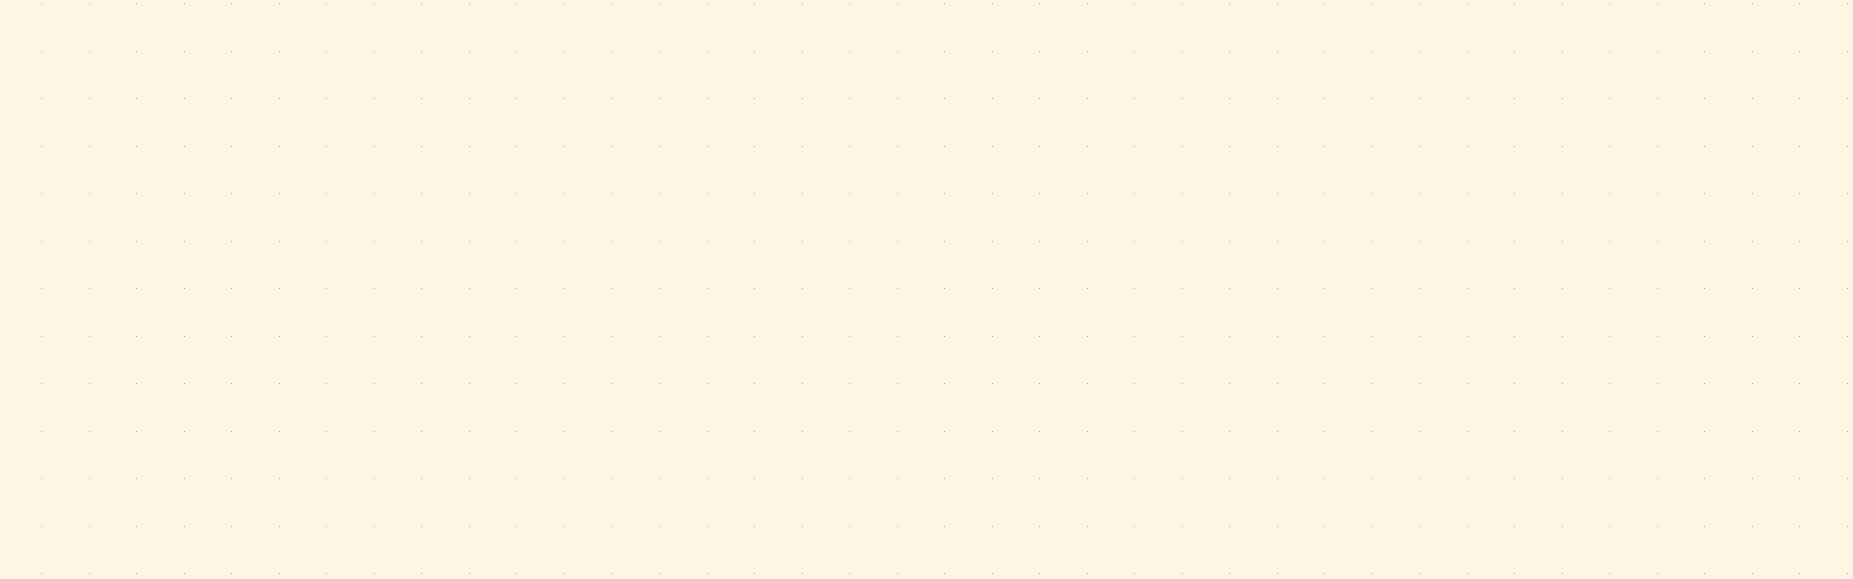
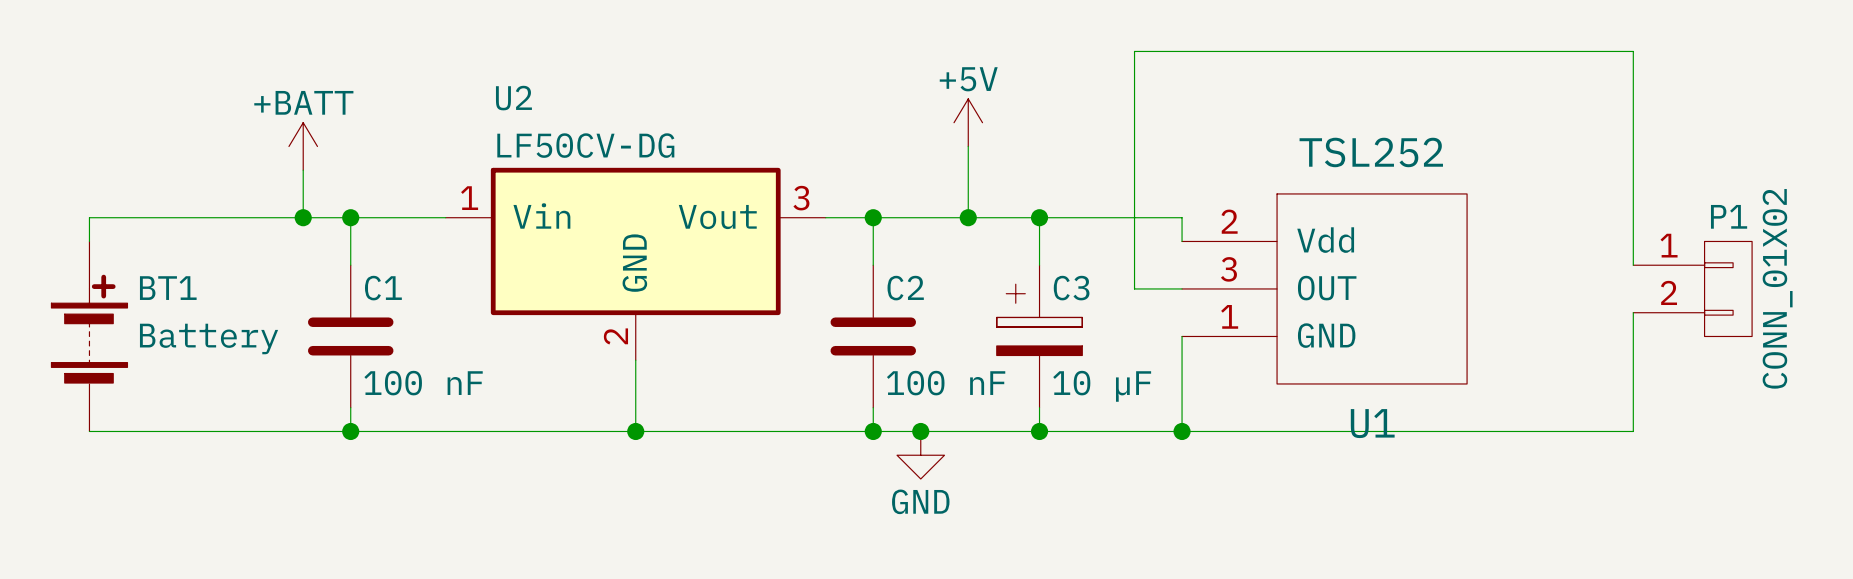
power symbol: none -> +5V (968, 122)
power symbol: none -> +BATT (303, 146)
wire: none -> (968, 146) (968, 217)
wire: none -> (303, 170) (303, 217)
junction: none -> (303, 217)
wire: none -> (350, 217) (350, 265)
junction: none -> (350, 217)
wire: none -> (445, 217) (89, 217) (89, 241)
wire: none -> (825, 217) (1182, 217) (1182, 241)
wire: none -> (873, 217) (873, 265)
junction: none -> (873, 217)
junction: none -> (968, 217)
wire: none -> (1039, 217) (1039, 265)
junction: none -> (1039, 217)
U2: none -> LF50CV-DG (635, 264)
wire: none -> (1633, 265) (1633, 51) (1134, 51) (1134, 288) (1182, 288)
U1: none -> TSL252 (1324, 288)
P1: none -> CONN_01X02 (1692, 288)
wire: none -> (1633, 312) (1633, 431) (89, 431)
BT1: none -> Battery (89, 336)
C1: none -> 100 nF (350, 336)
C2: none -> 100 nF (873, 336)
C3: none -> 10 µF (1039, 336)
wire: none -> (1182, 336) (1182, 431)
wire: none -> (635, 360) (635, 431)
wire: none -> (350, 407) (350, 431)
wire: none -> (873, 407) (873, 431)
wire: none -> (1039, 407) (1039, 431)
junction: none -> (350, 431)
junction: none -> (635, 431)
junction: none -> (873, 431)
junction: none -> (920, 431)
junction: none -> (1039, 431)
junction: none -> (1182, 431)
power symbol: none -> GND (920, 455)

